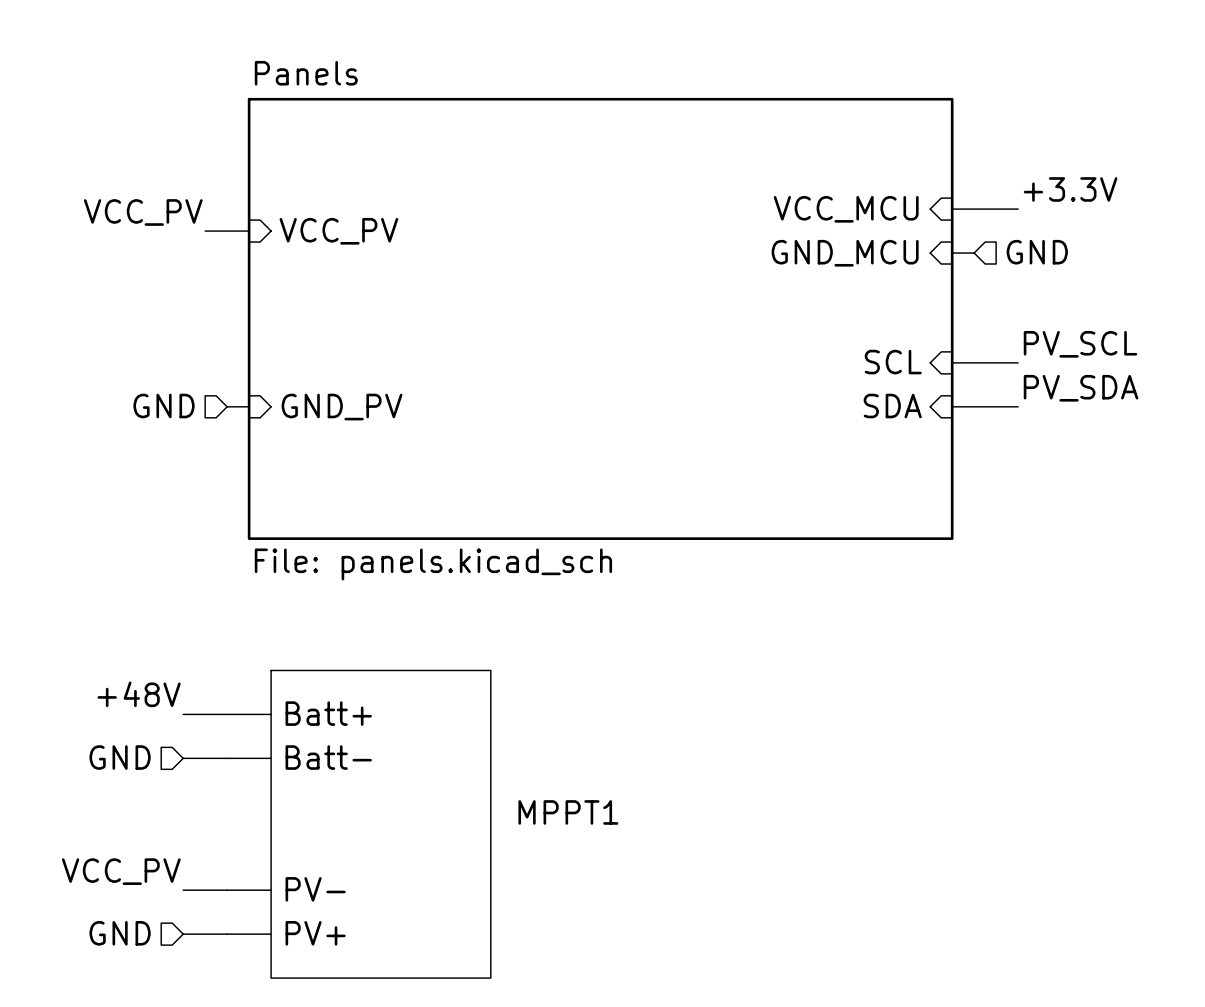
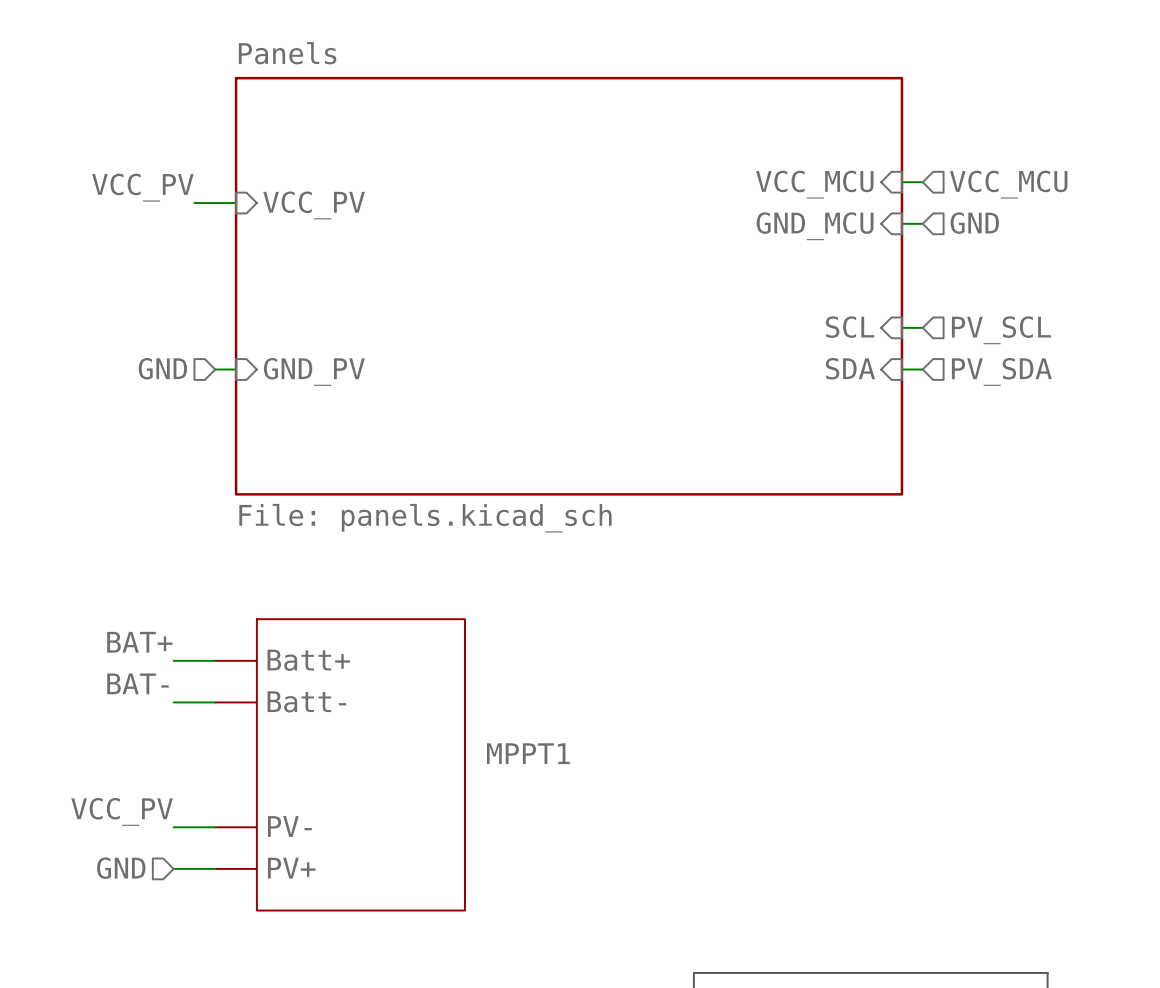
label: +3.3V (1070, 189) -> none
wire: (974, 209) (1018, 209) -> none
hierarchical label: none -> VCC_MCU (1008, 184)
label: PV_SCL (1080, 344) -> none
wire: (974, 362) (1018, 362) -> none
hierarchical label: none -> PV_SCL (1001, 330)
label: PV_SDA (1081, 388) -> none
wire: (974, 406) (1018, 406) -> none
hierarchical label: none -> PV_SDA (1001, 371)
label: +48V (139, 694) -> BAT+ (139, 642)
label: none -> BAT- (137, 683)
hierarchical label: GND (120, 757) -> none

